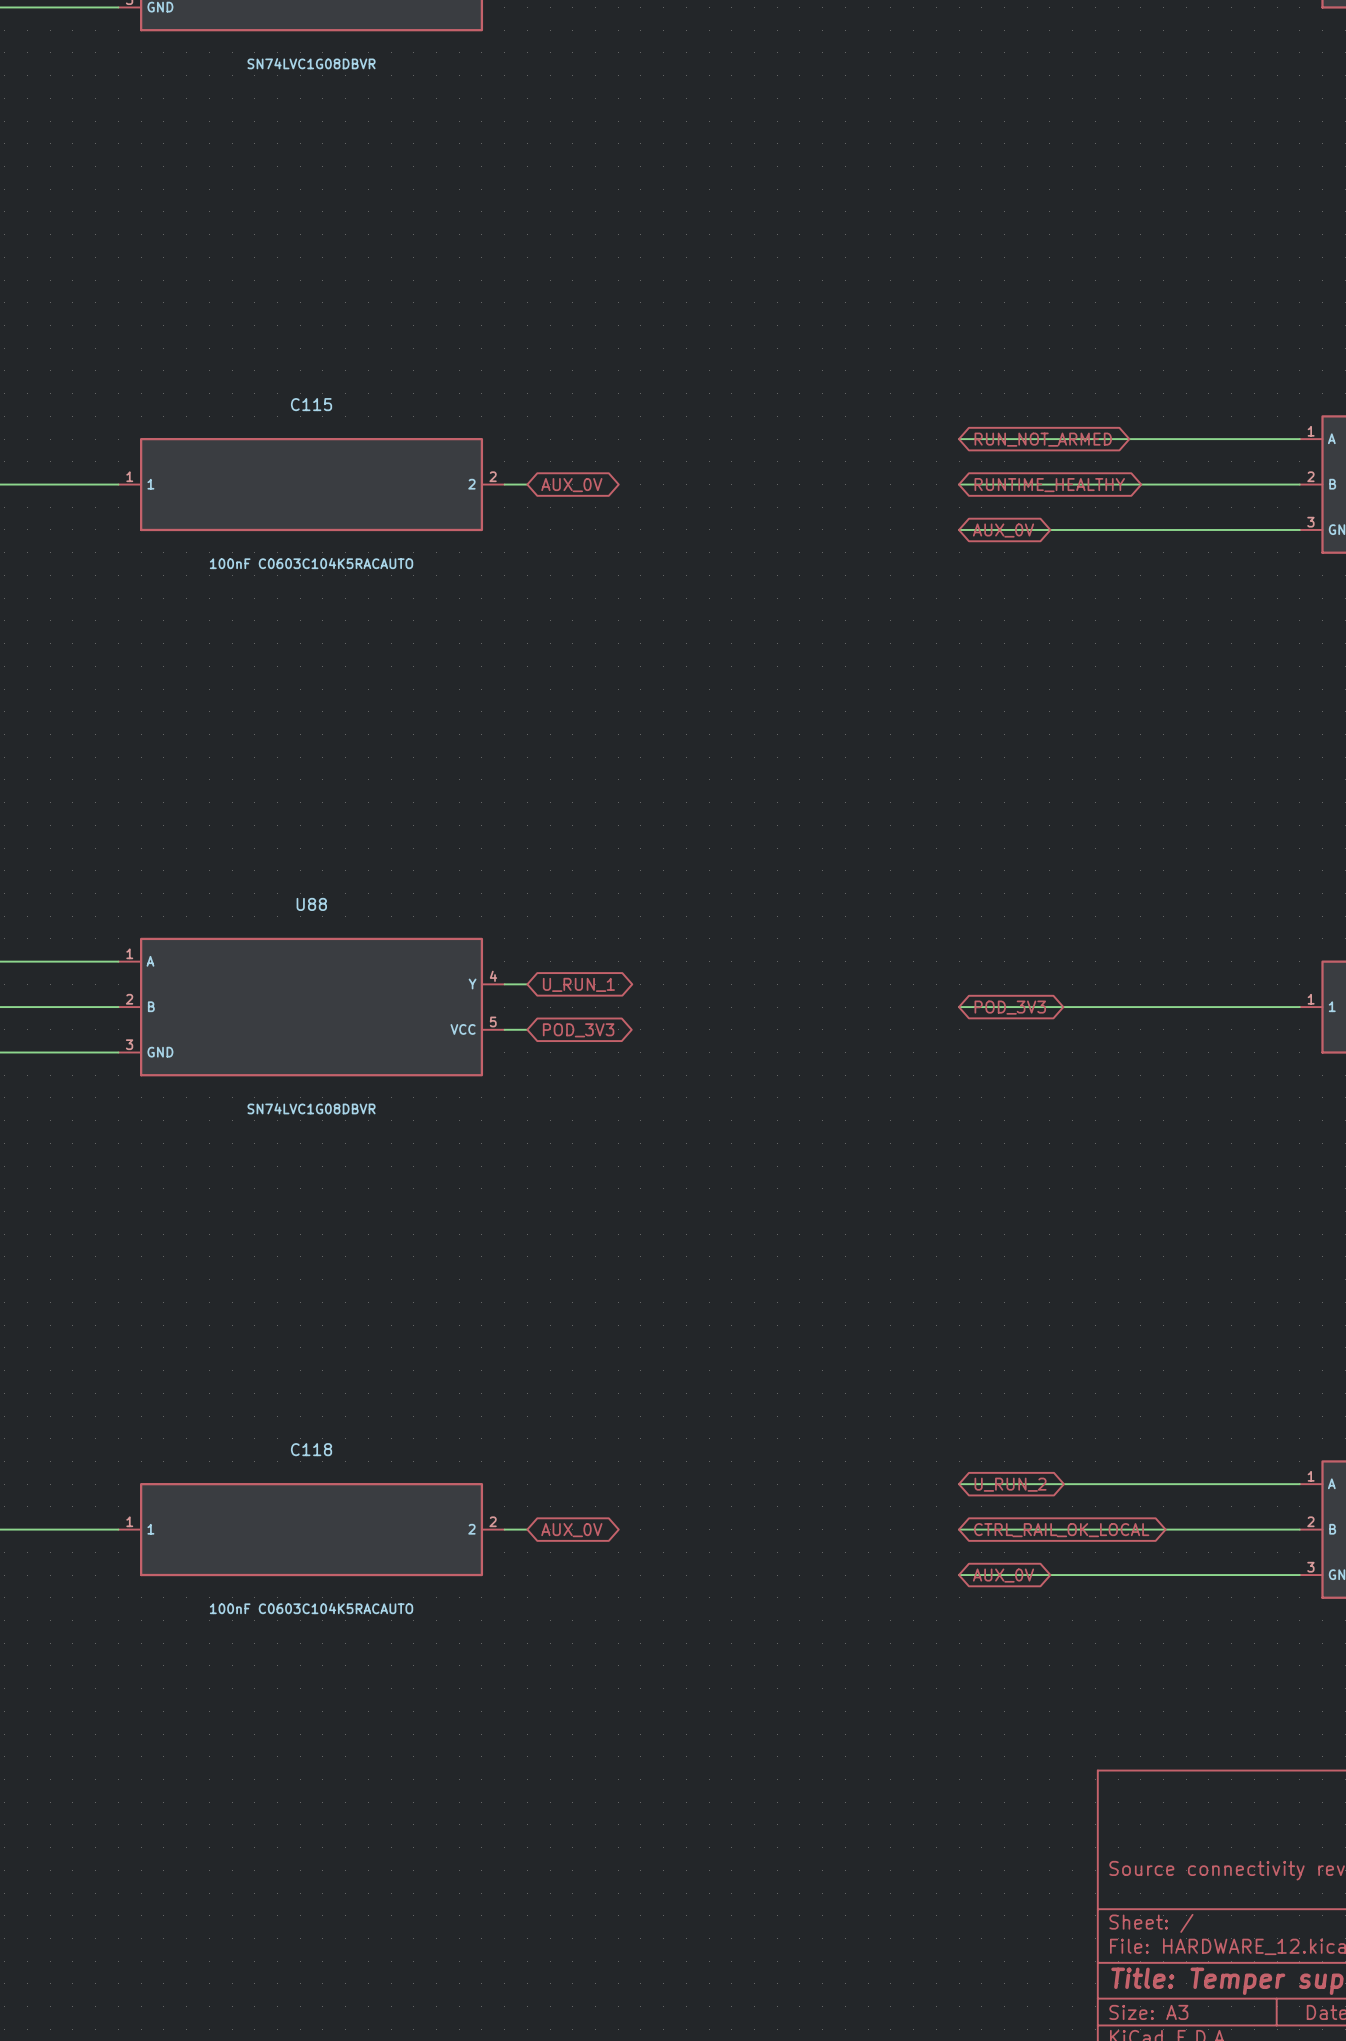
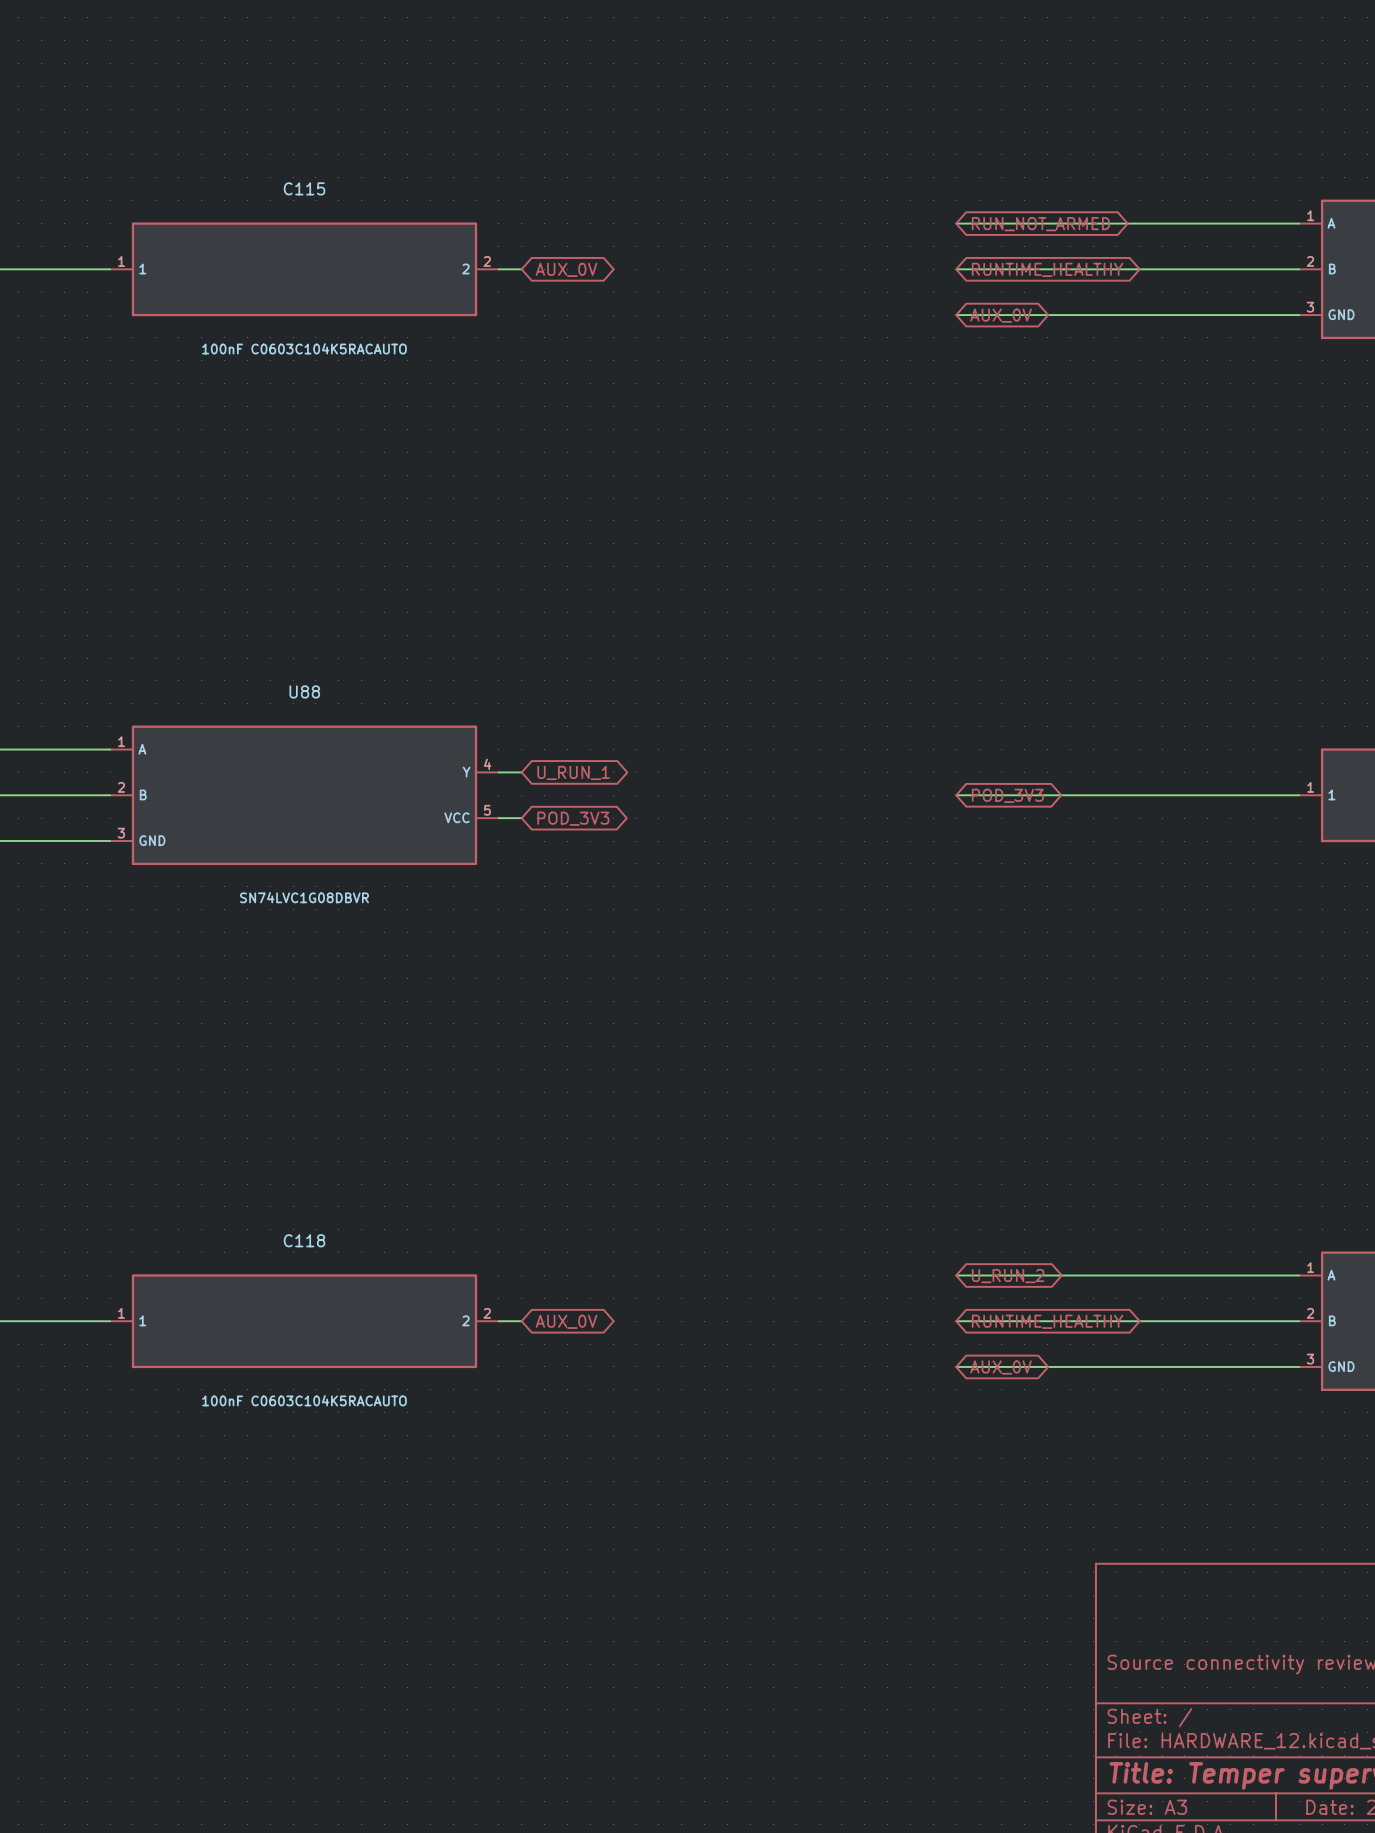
global label: CTRL_RAIL_OK_LOCAL (1061, 1530) -> RUNTIME_HEALTHY (1047, 1321)

